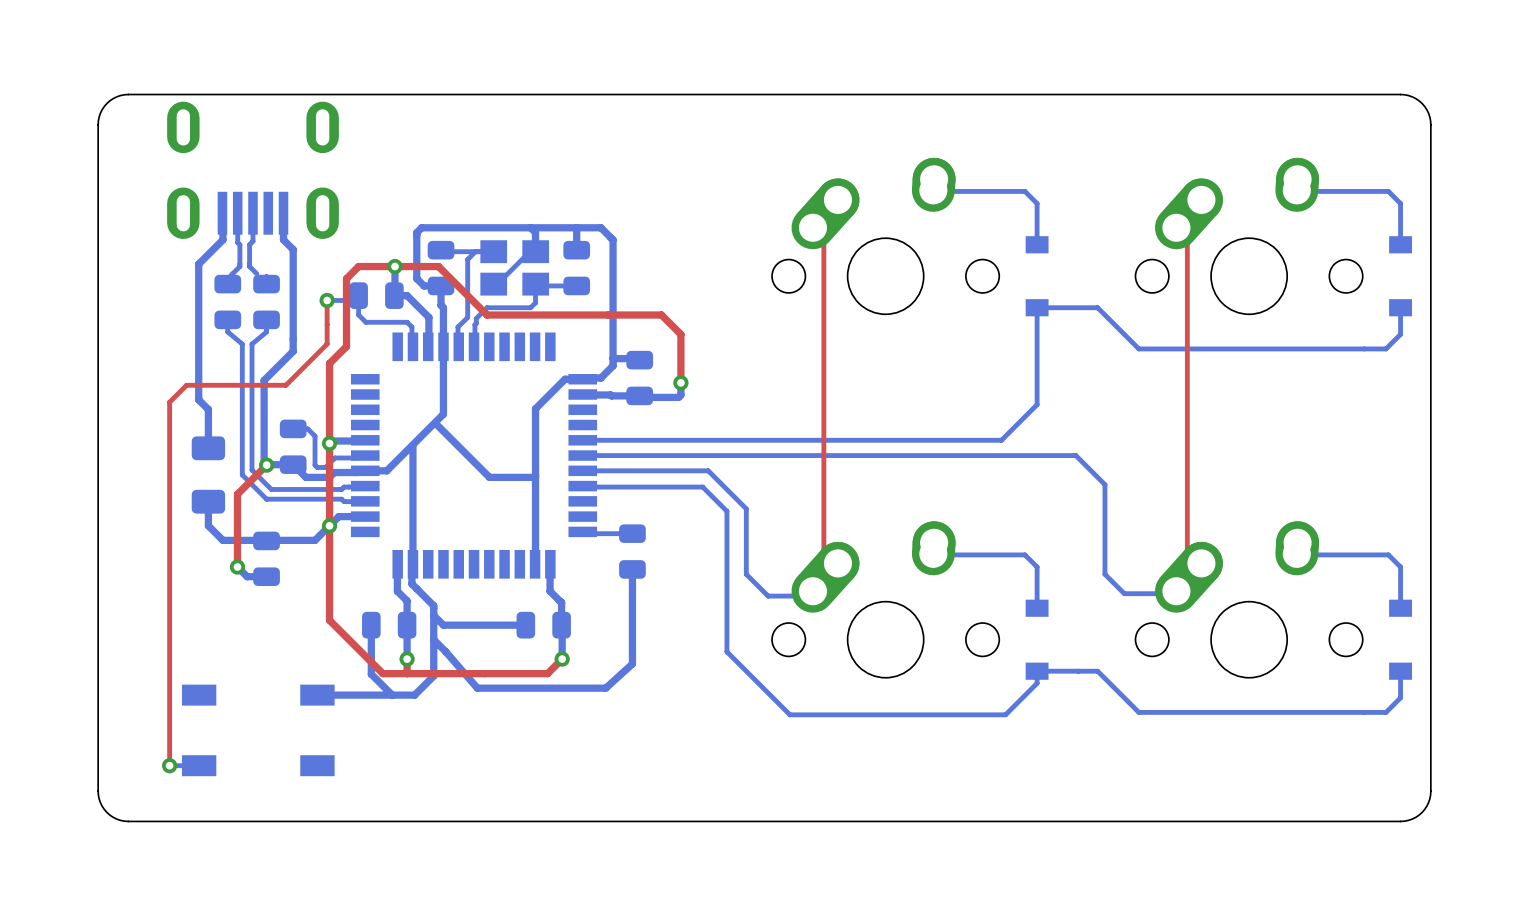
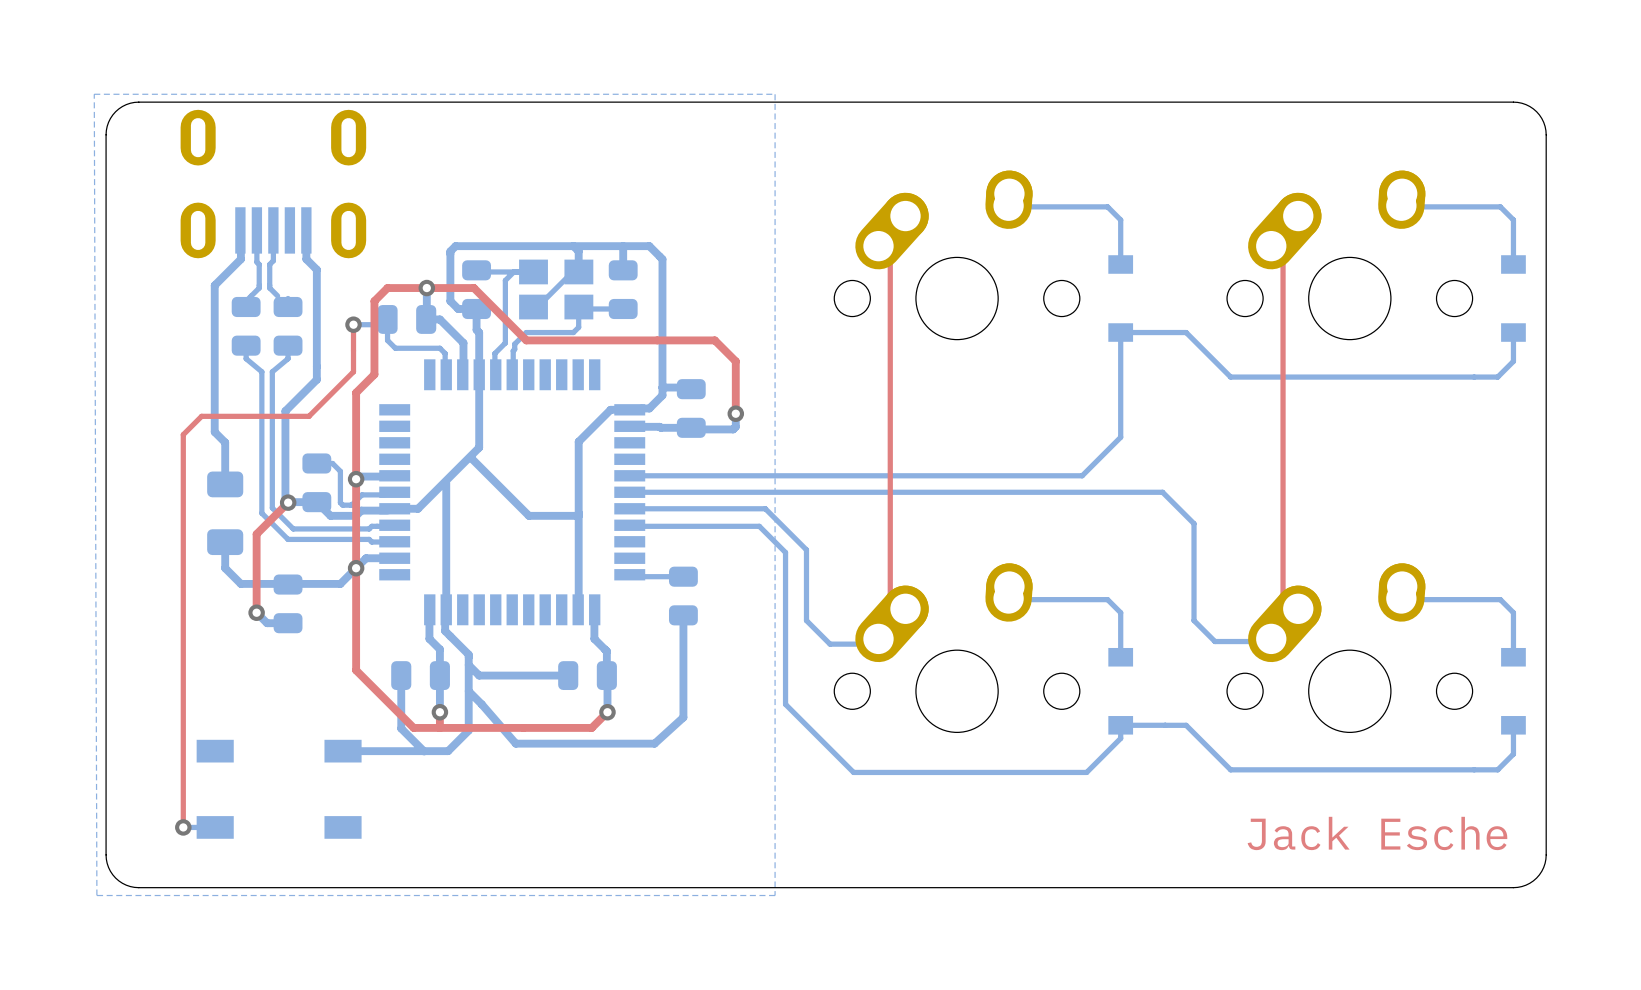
bottom zone outline: none -> (94, 94) (96, 895) (775, 895) (775, 94) (94, 94)
text: none -> Jack Esche (1377, 833)

